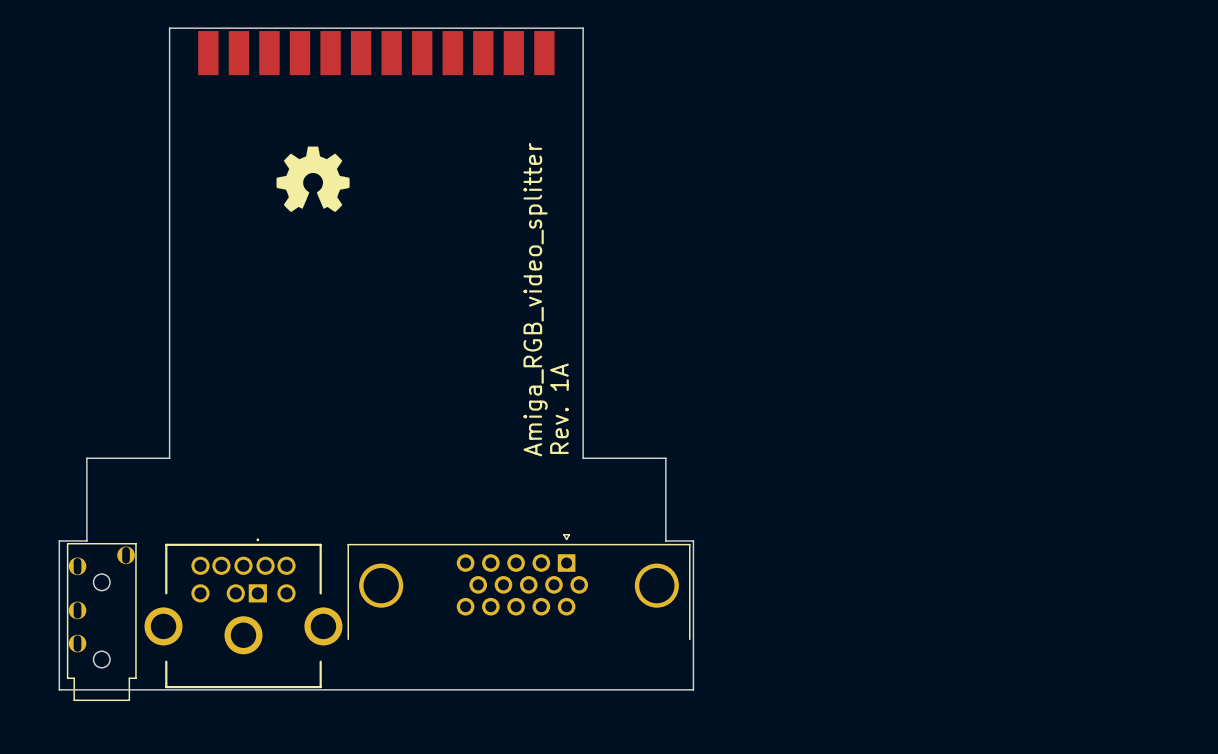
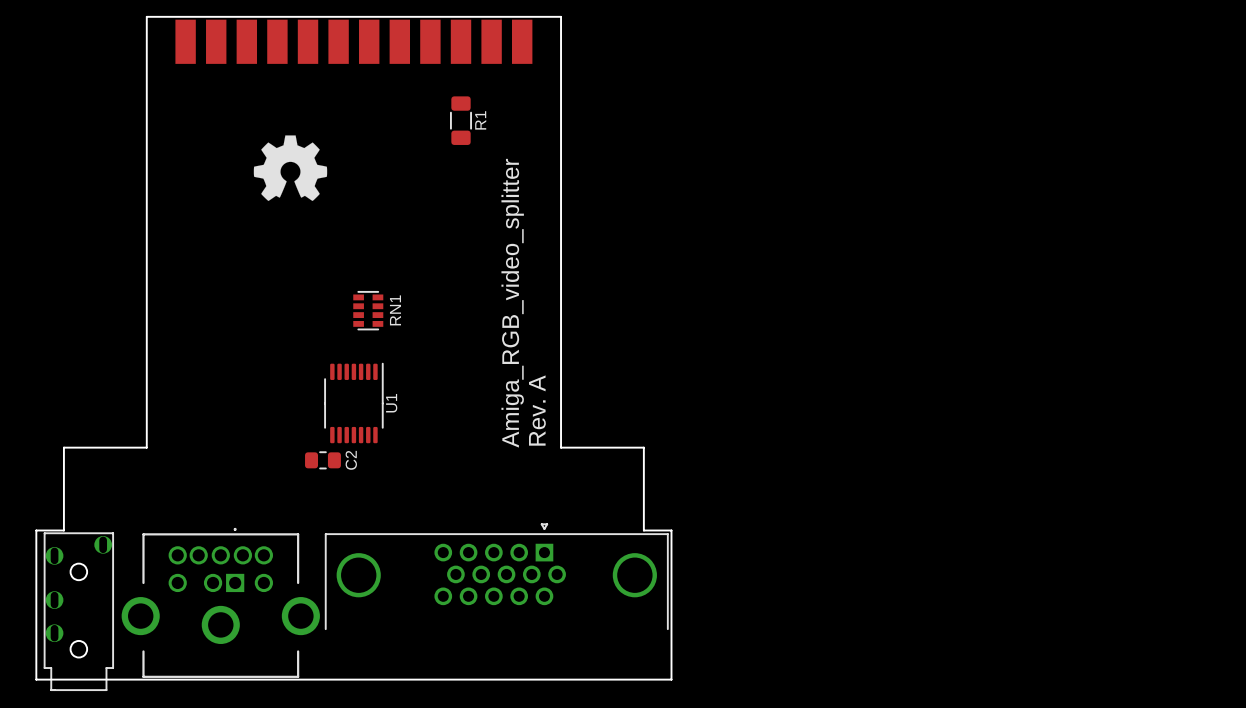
R1: none -> (461, 120)
RN1: none -> (368, 310)
text: Rev. 1A (559, 408) -> Rev. A (537, 410)
U1: none -> (353, 403)
C2: none -> (322, 460)

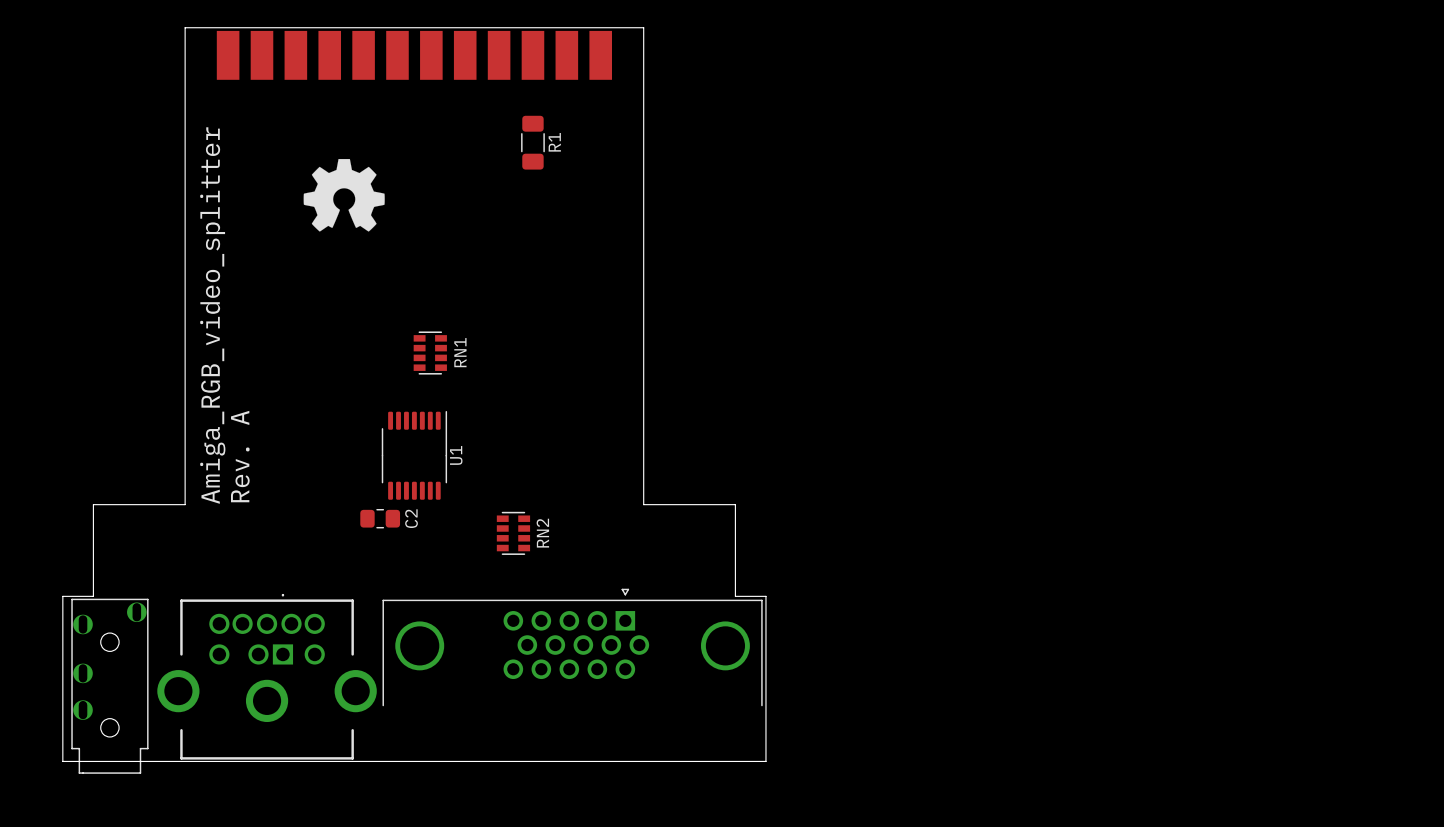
text: none -> Amiga_RGB_video_splitter (212, 315)
text: Amiga_RGB_video_splitter (512, 303) -> none
text: none -> Rev. A (240, 456)
text: Rev. A (537, 410) -> none
RN2: none -> (513, 533)

